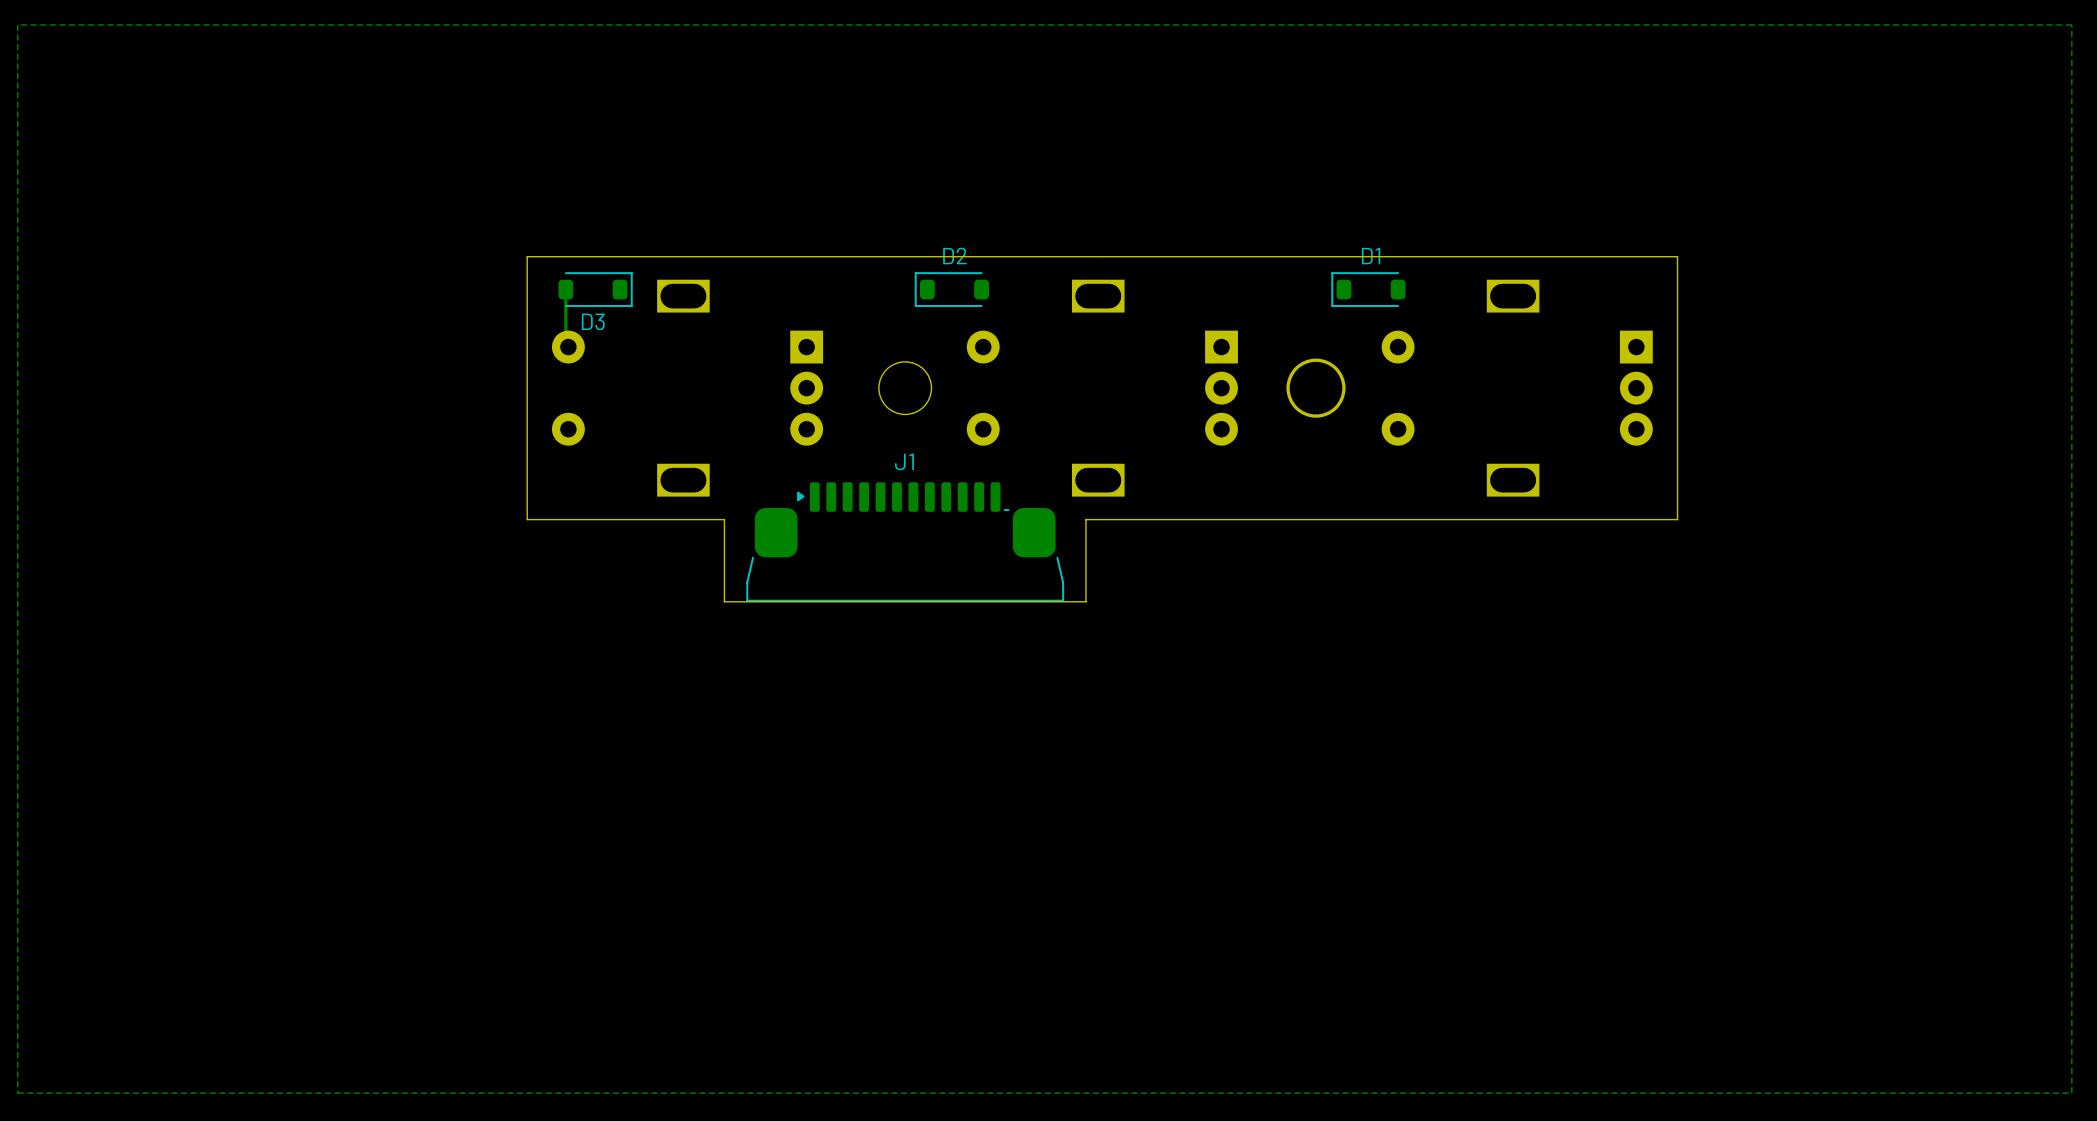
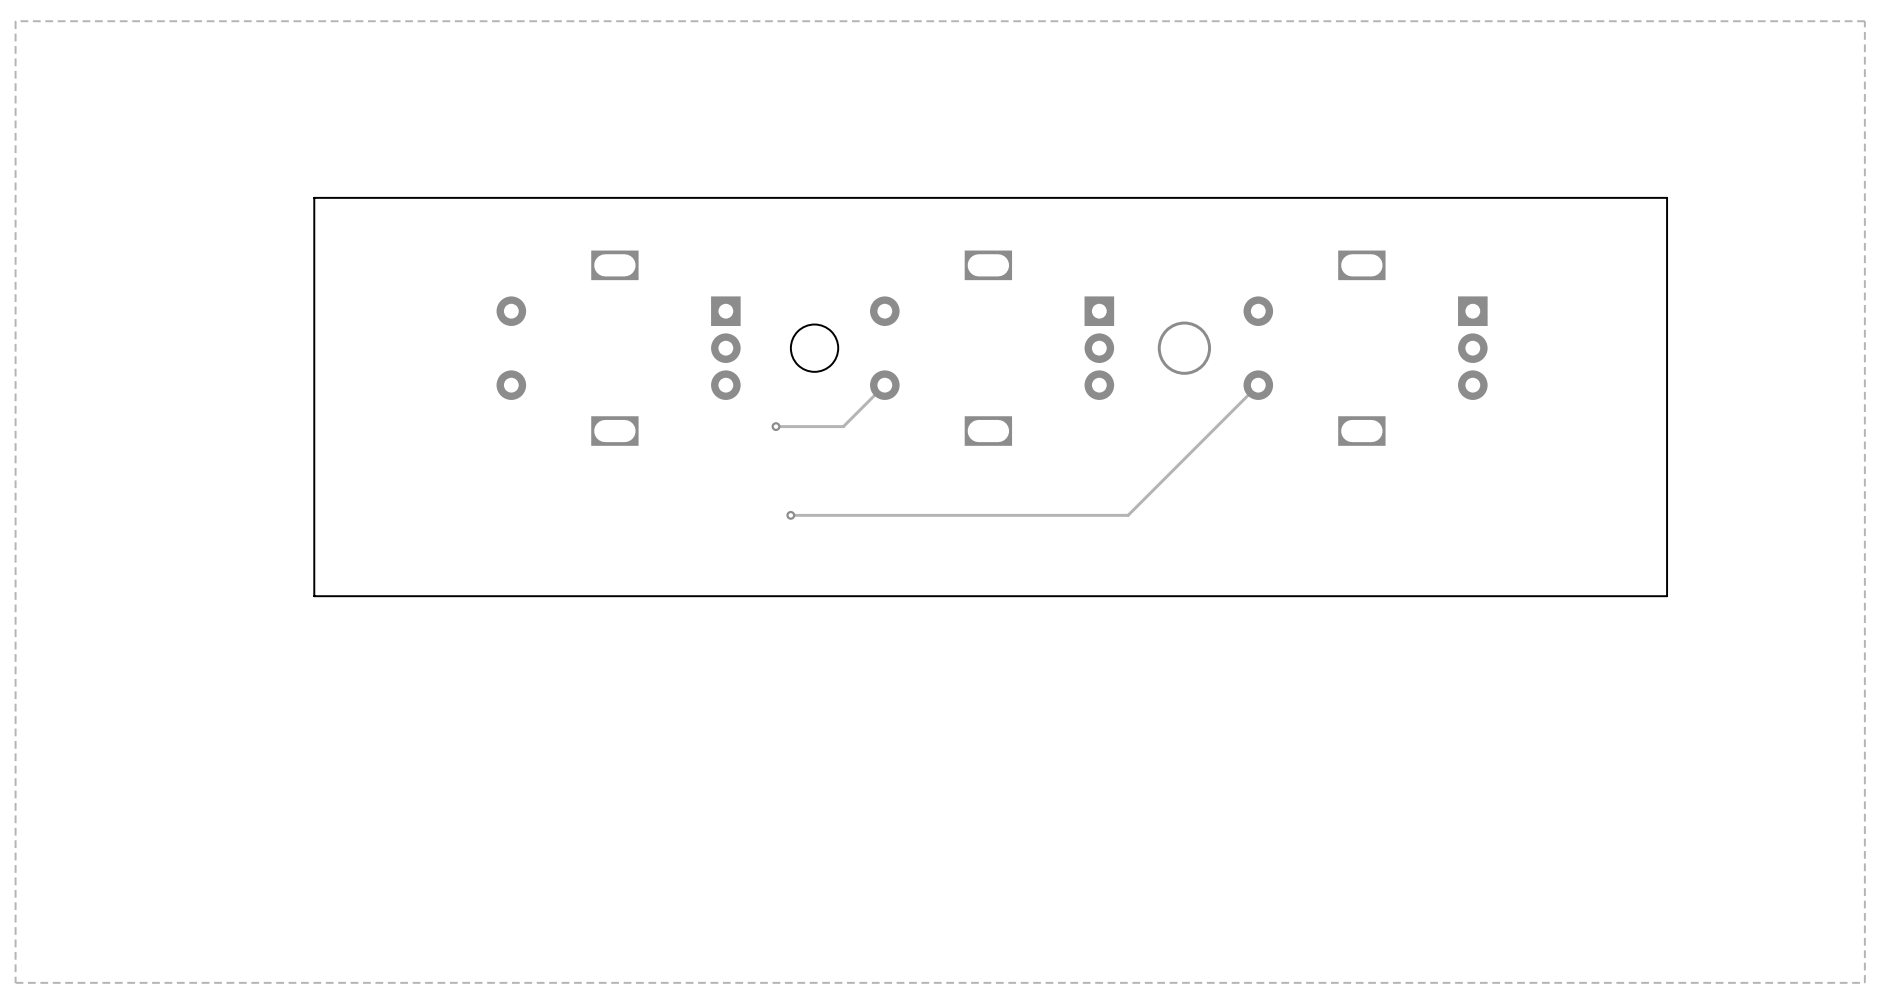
board edge: (1677, 256) (527, 256) (527, 519) (724, 519) (724, 601) (1085, 601) (1085, 519) (1677, 519) (1677, 256) -> (1667, 197) (1667, 596) (314, 596) (314, 197) (1667, 197)
track: (565, 289) (565, 344) (568, 347) -> none
D3: (595, 289) -> none
D2: (951, 289) -> none
D1: (1368, 289) -> none
track: none -> (884, 385) (843, 426) (776, 426)
track: none -> (1258, 385) (1128, 515) (790, 515)
via: none -> (776, 426)
J1: (905, 541) -> none
via: none -> (790, 515)

